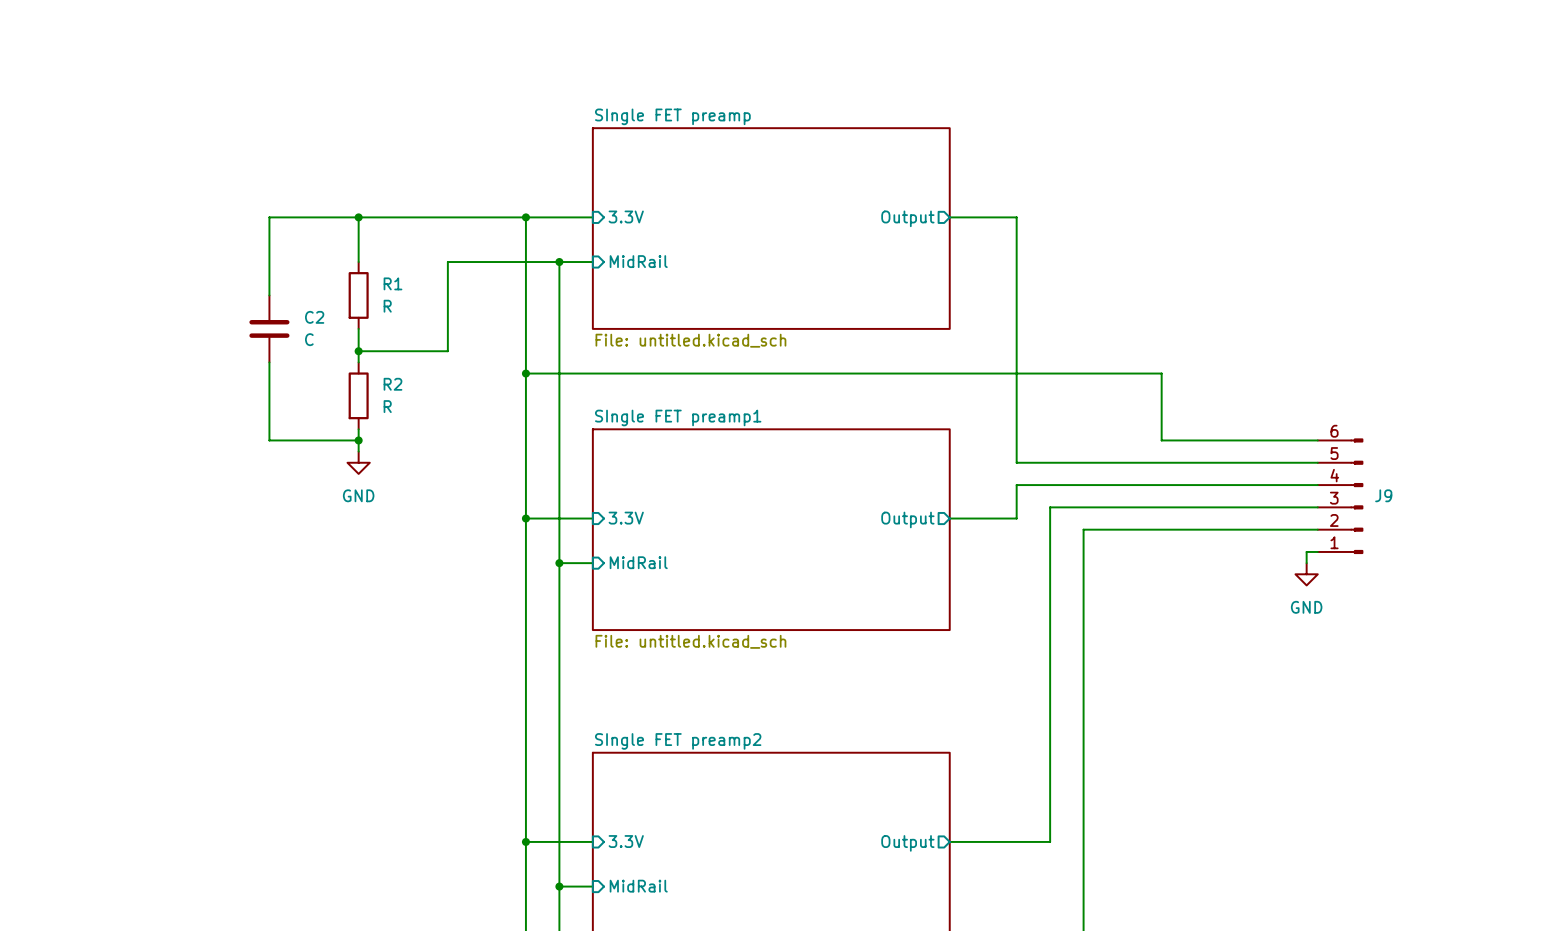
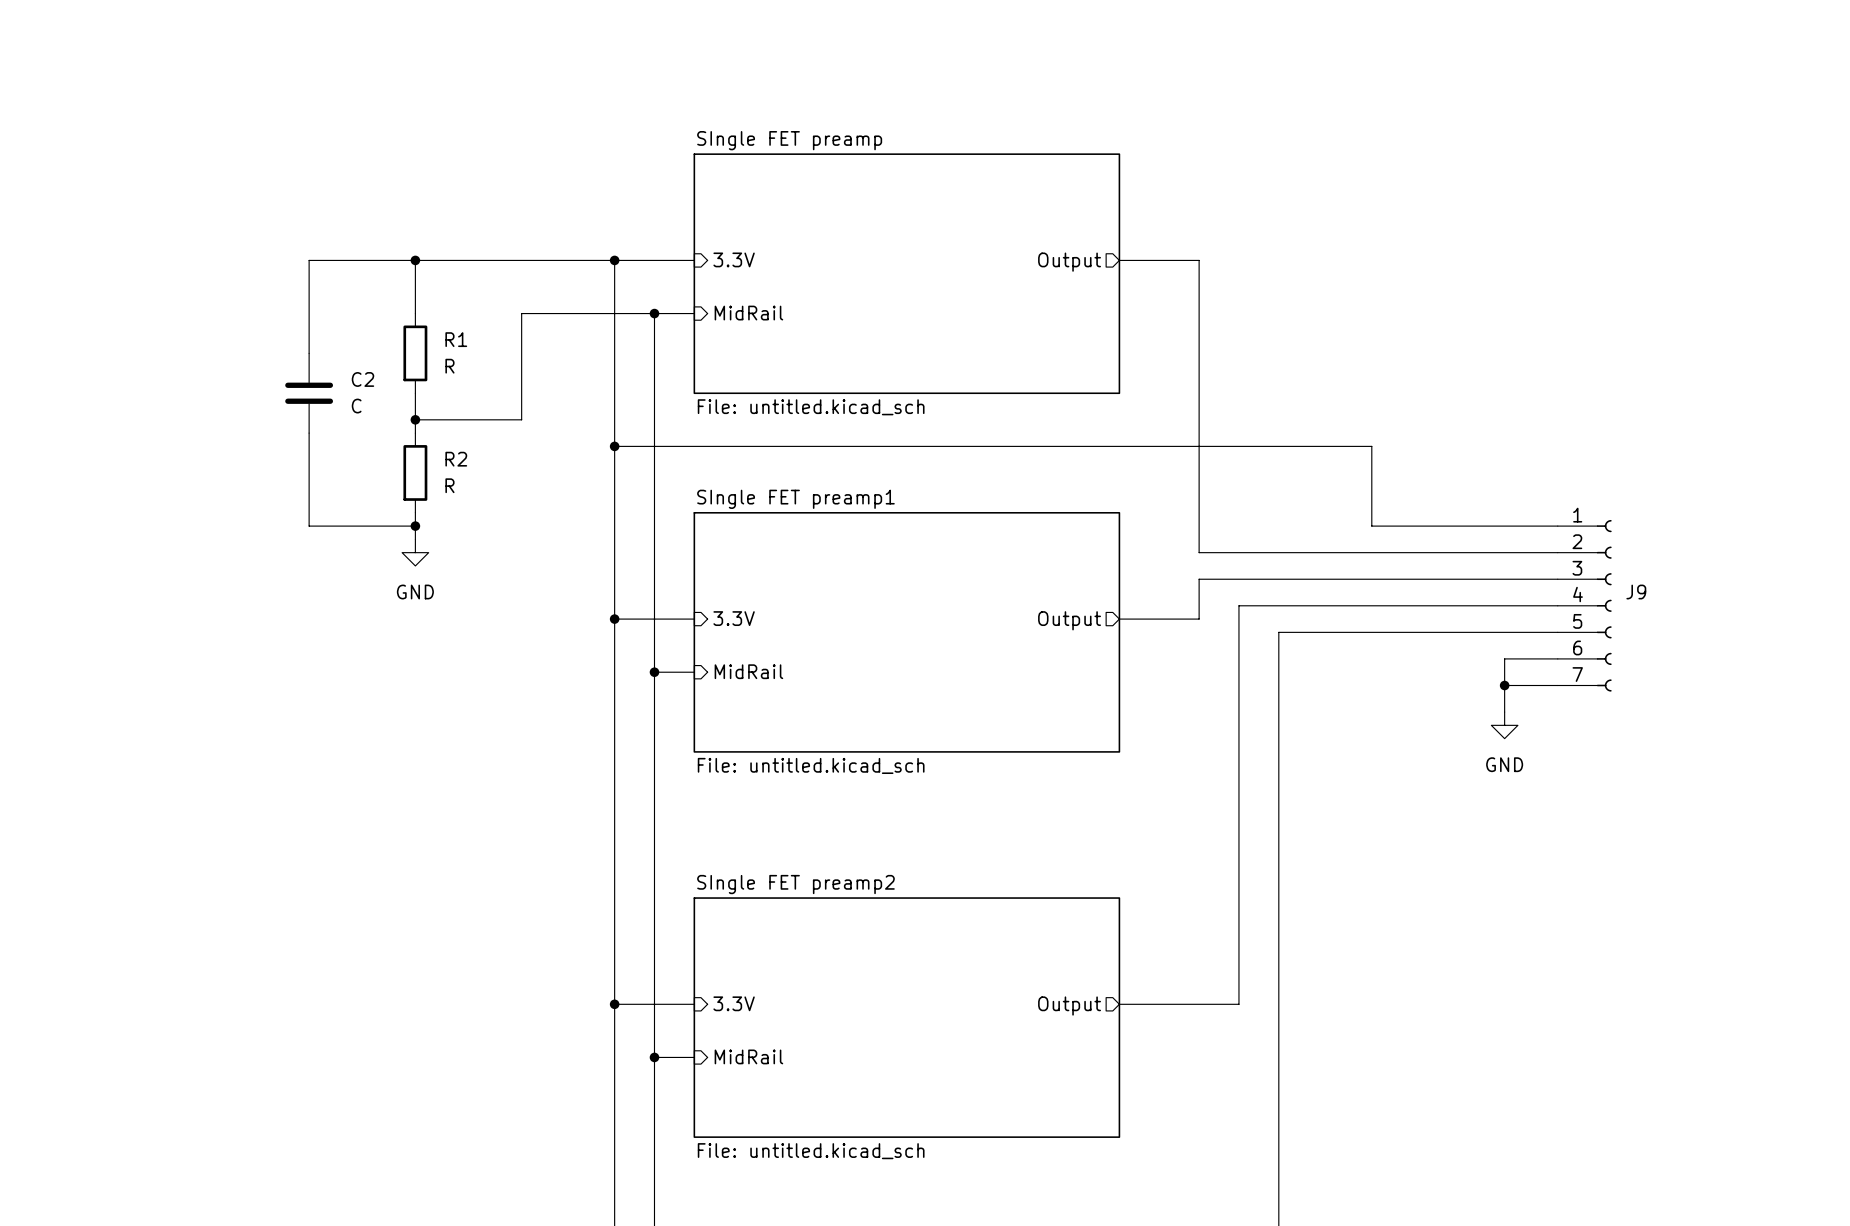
J9 symbol: [1317, 438, 1364, 554] -> [1557, 519, 1612, 692]
wire: (1306, 551) (1306, 563) -> (1544, 658) (1504, 658) (1504, 712)
wire: none -> (1504, 685) (1557, 685)
junction: none -> (1504, 685)
power symbol position: GND (1306, 574) -> GND (1504, 725)

